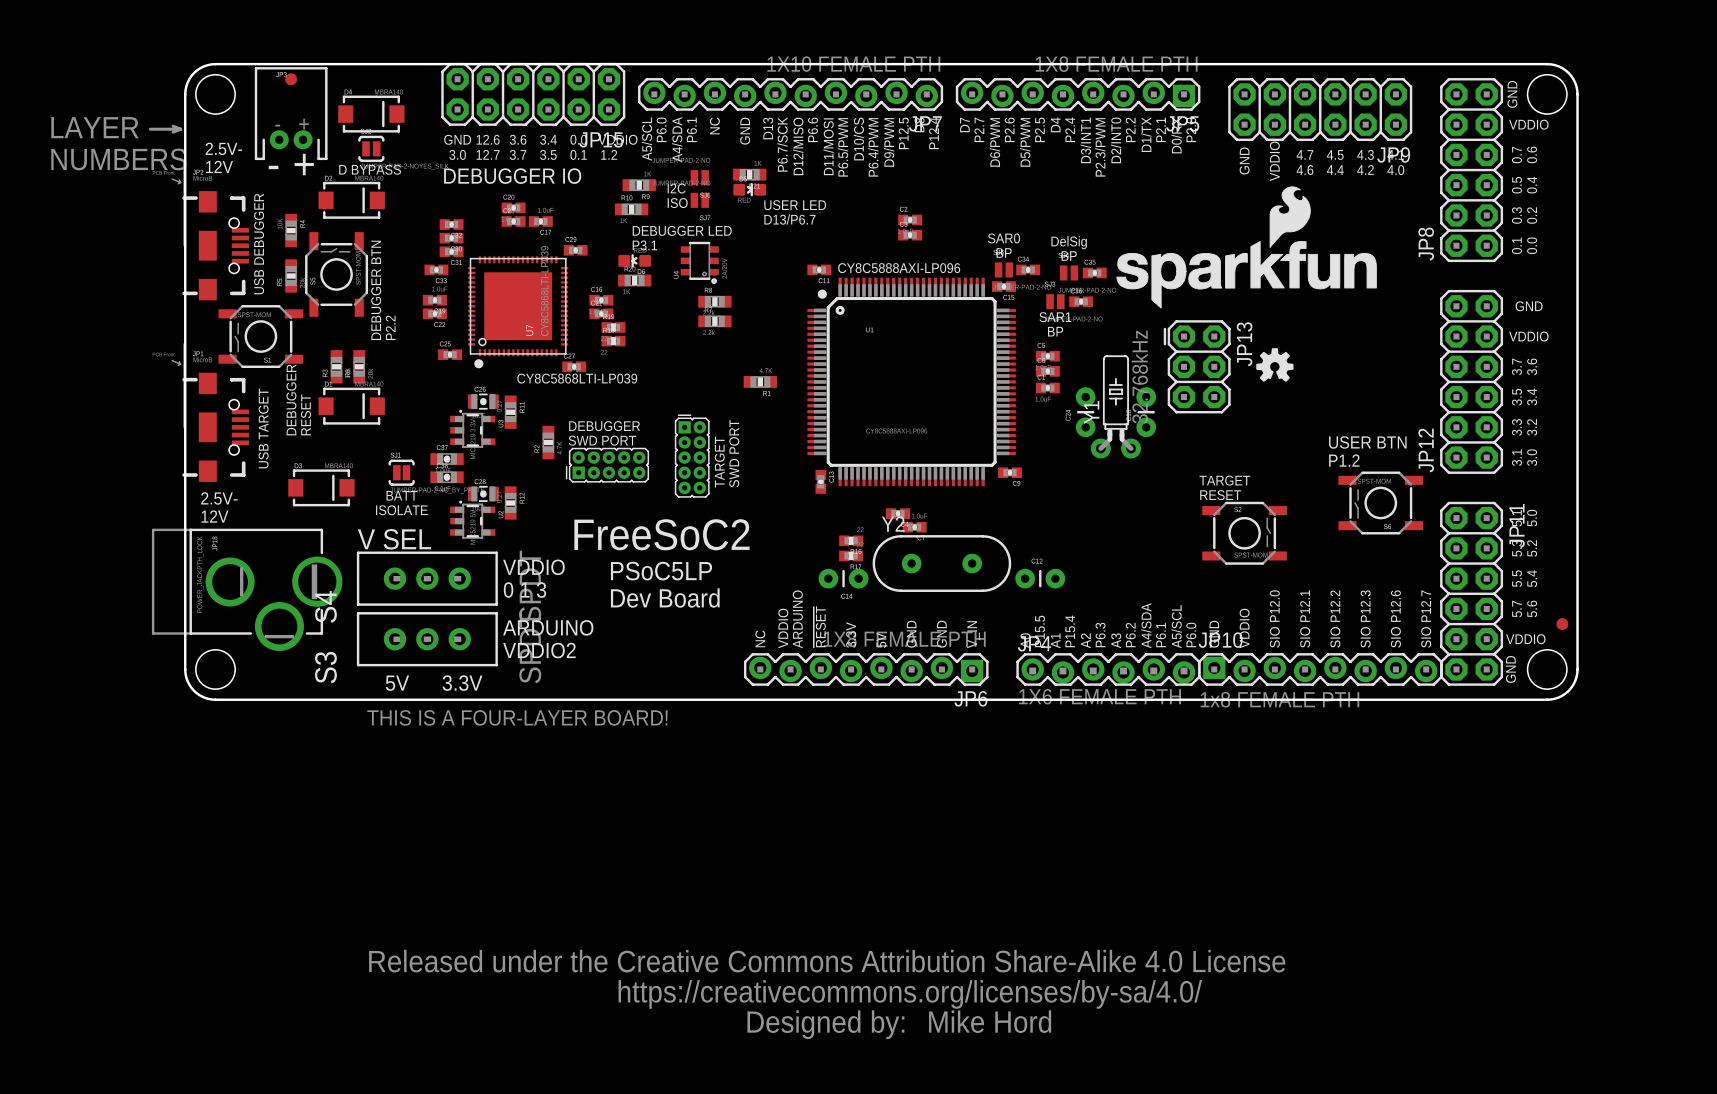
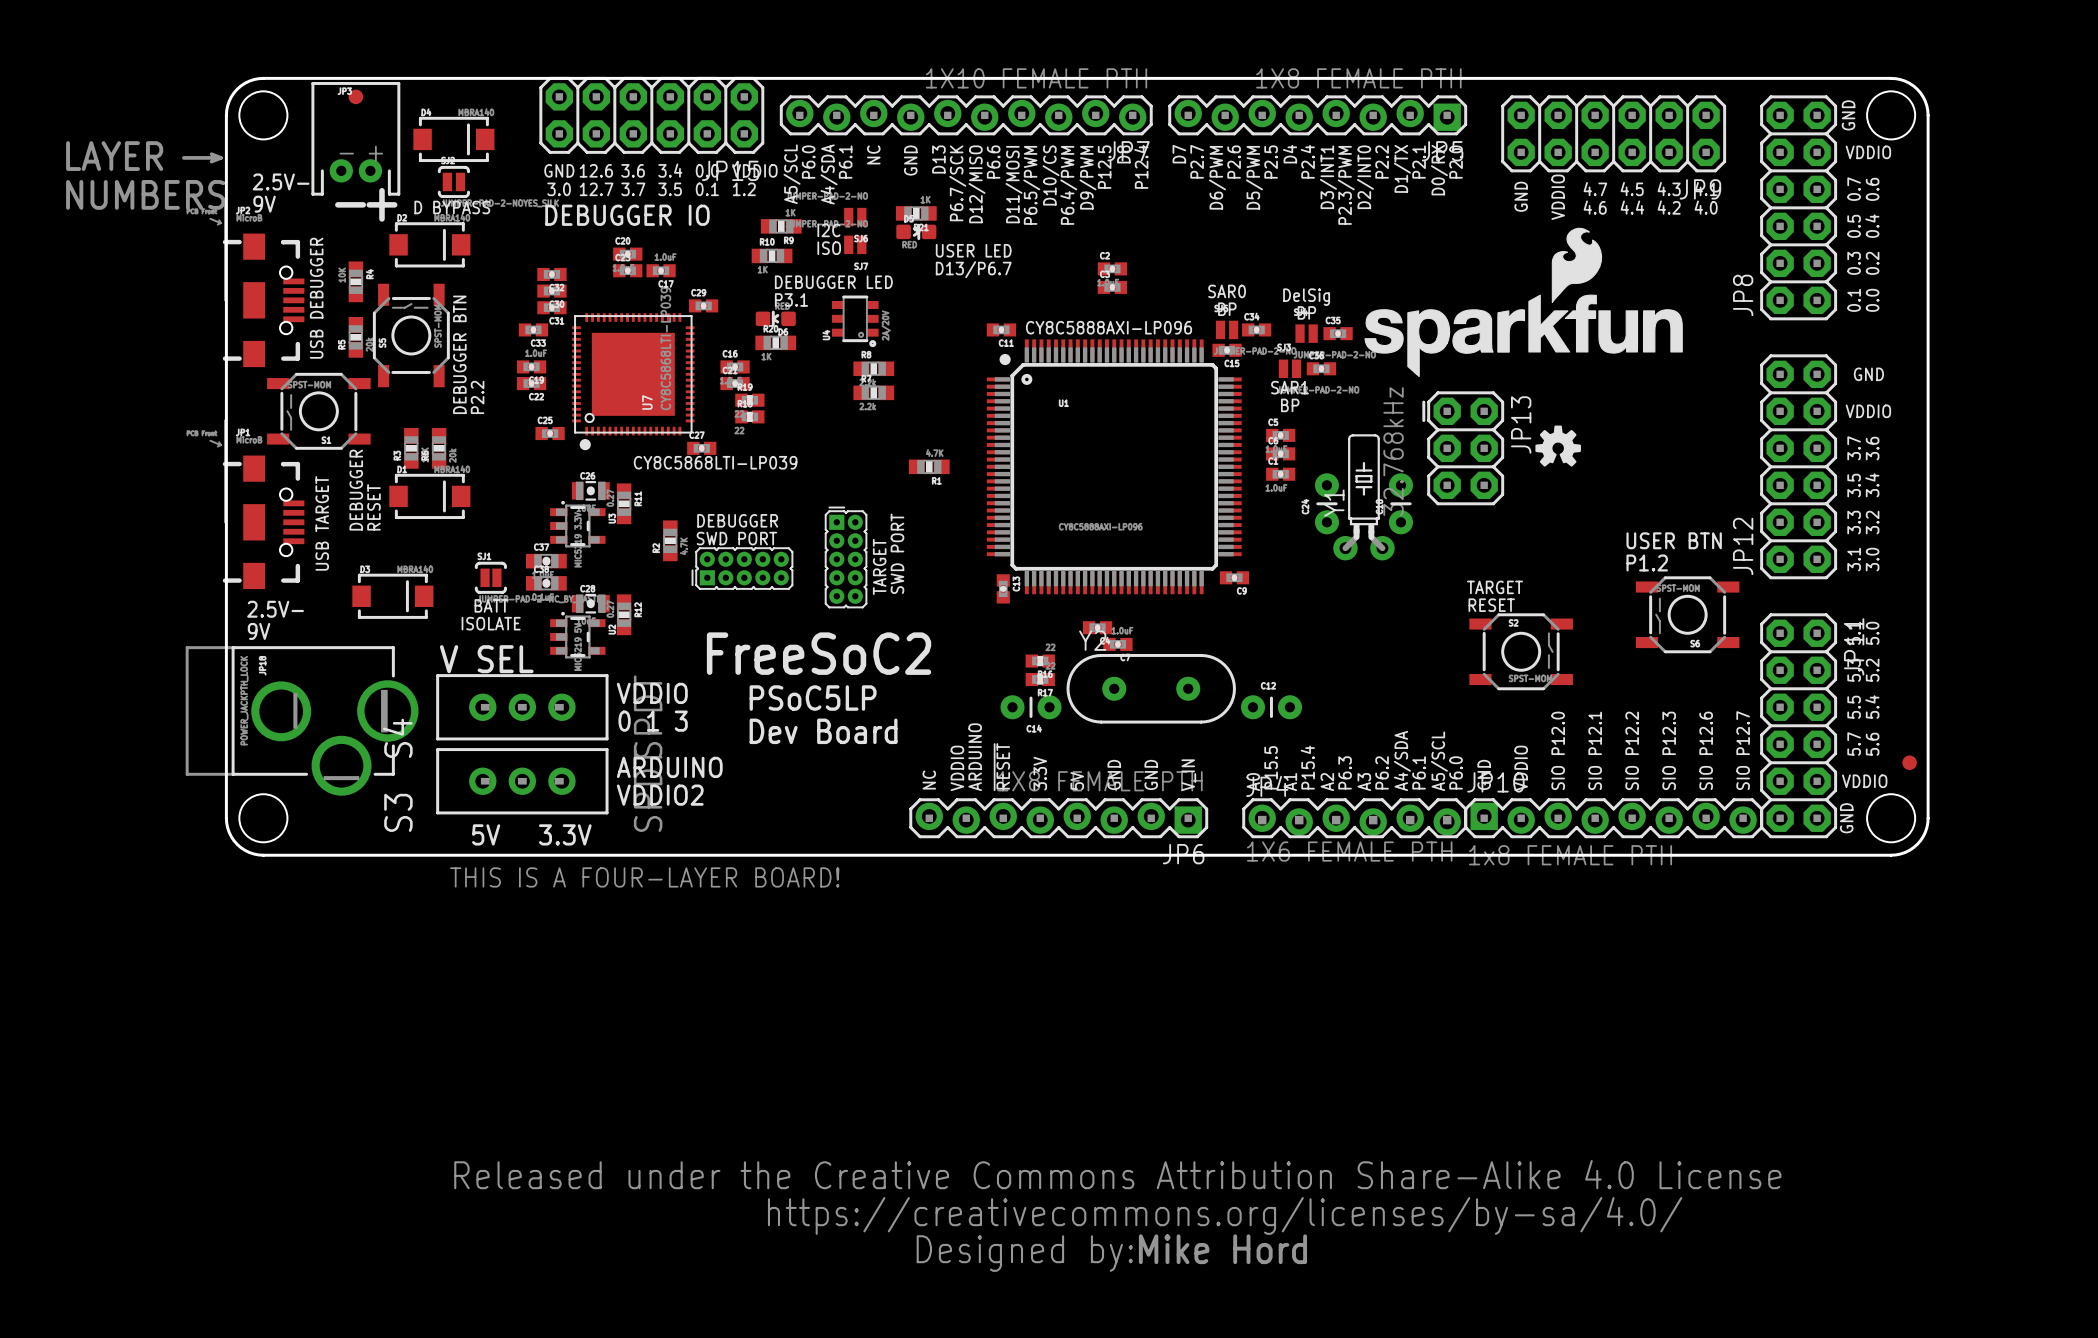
text: 12V (219, 166) -> 9V (264, 204)
text: 12V (215, 516) -> 9V (259, 631)

